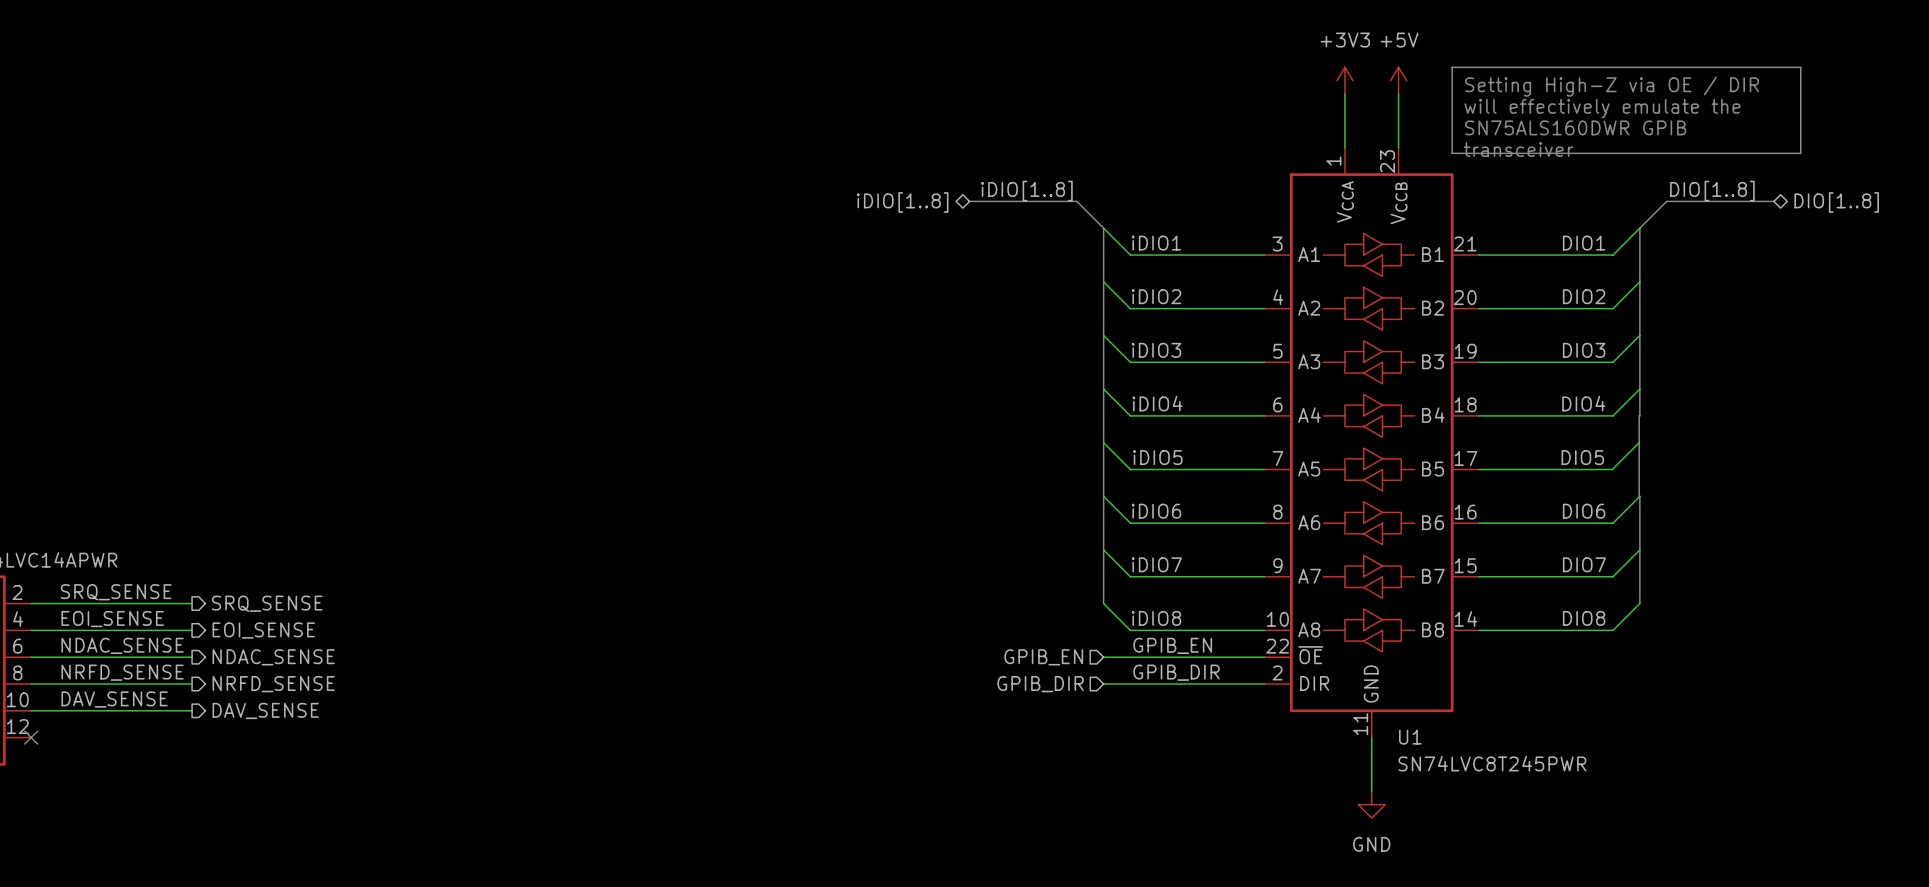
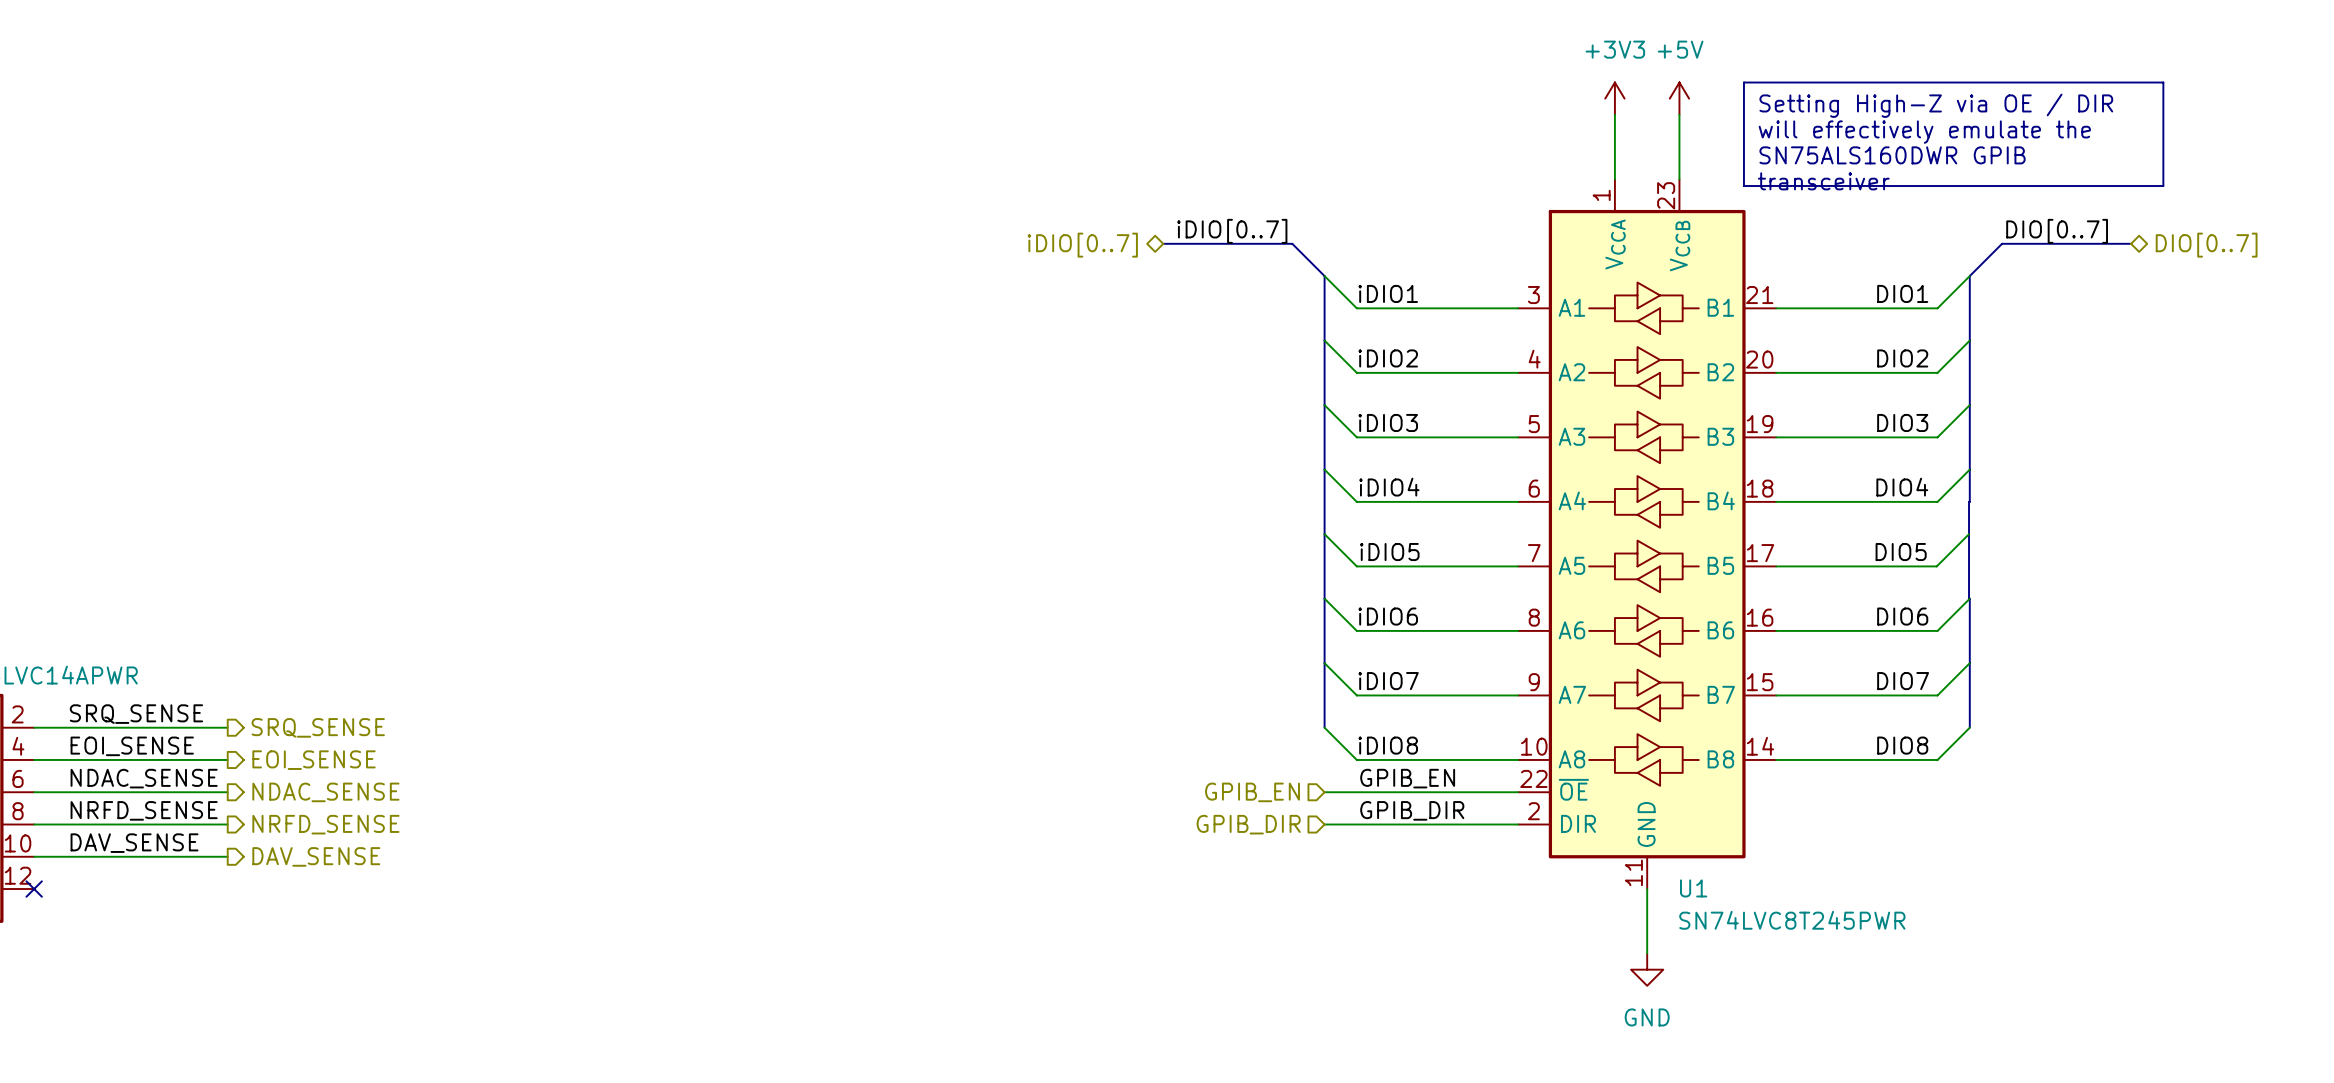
label: iDIO[1..8] (1026, 191) -> iDIO[0..7] (1232, 231)
label: DIO[1..8] (1712, 191) -> DIO[0..7] (2057, 231)
hierarchical label: iDIO[1..8] (902, 202) -> iDIO[0..7] (1082, 245)
hierarchical label: DIO[1..8] (1836, 202) -> DIO[0..7] (2206, 245)

